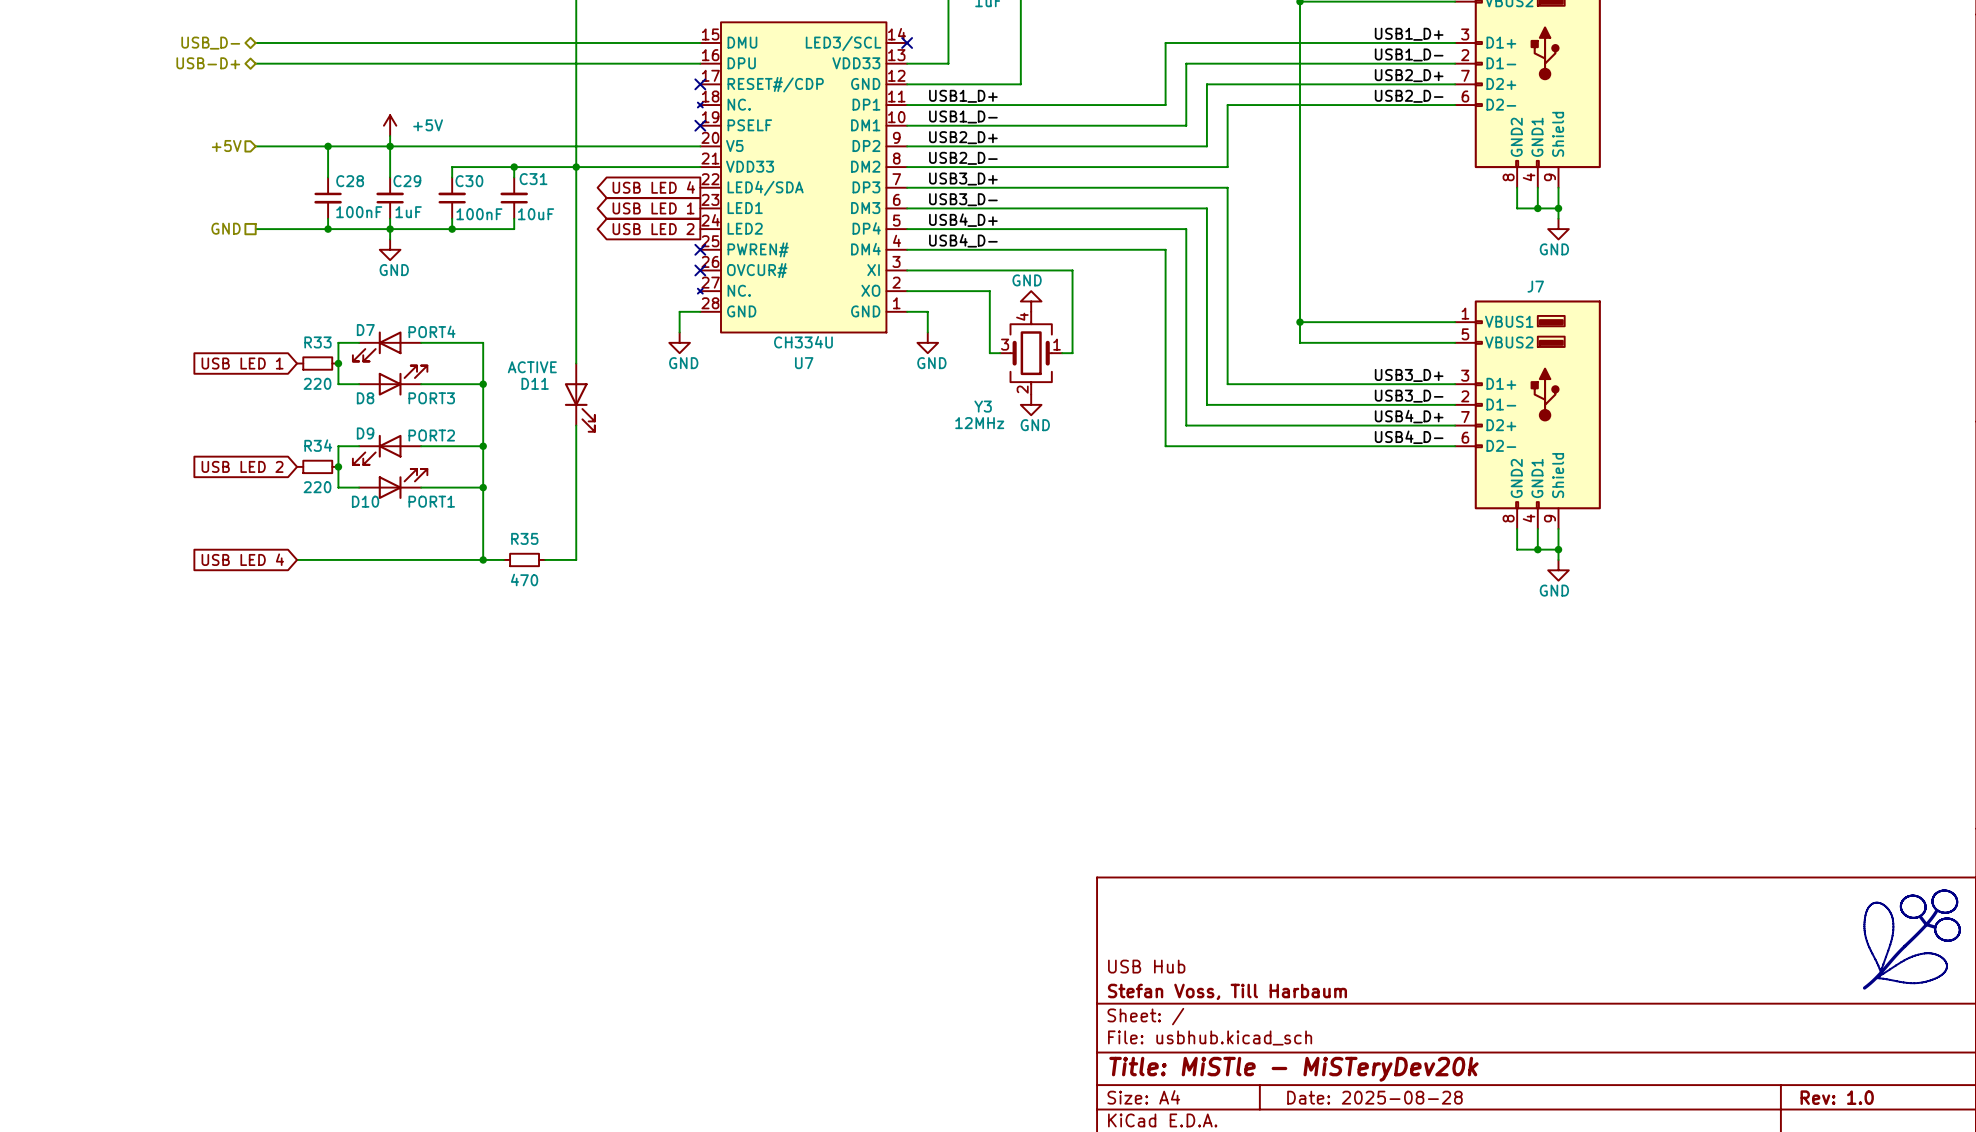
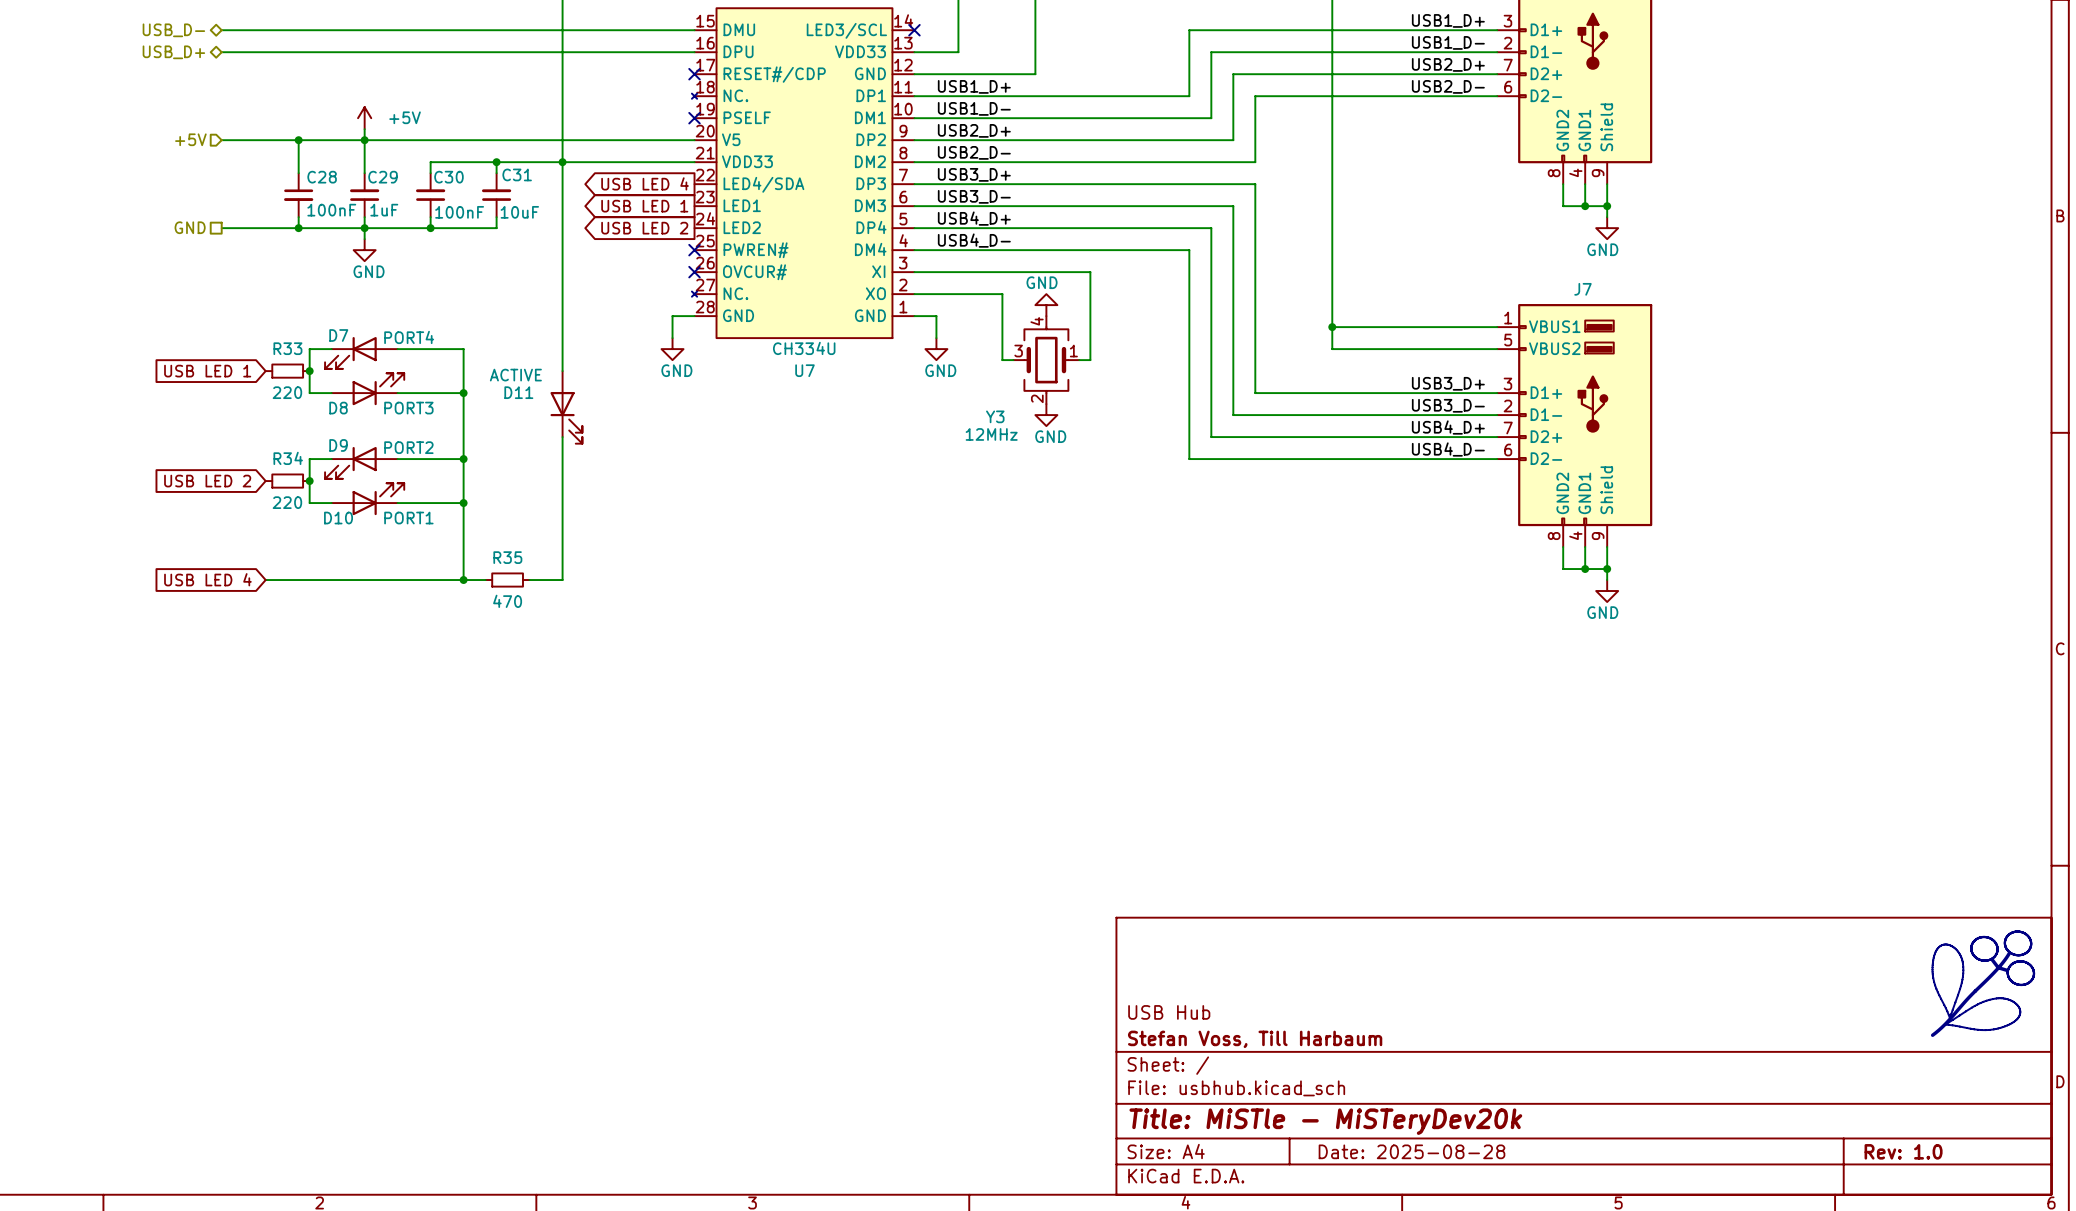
hierarchical label: USB-D+ (208, 63) -> USB_D+ (173, 52)

